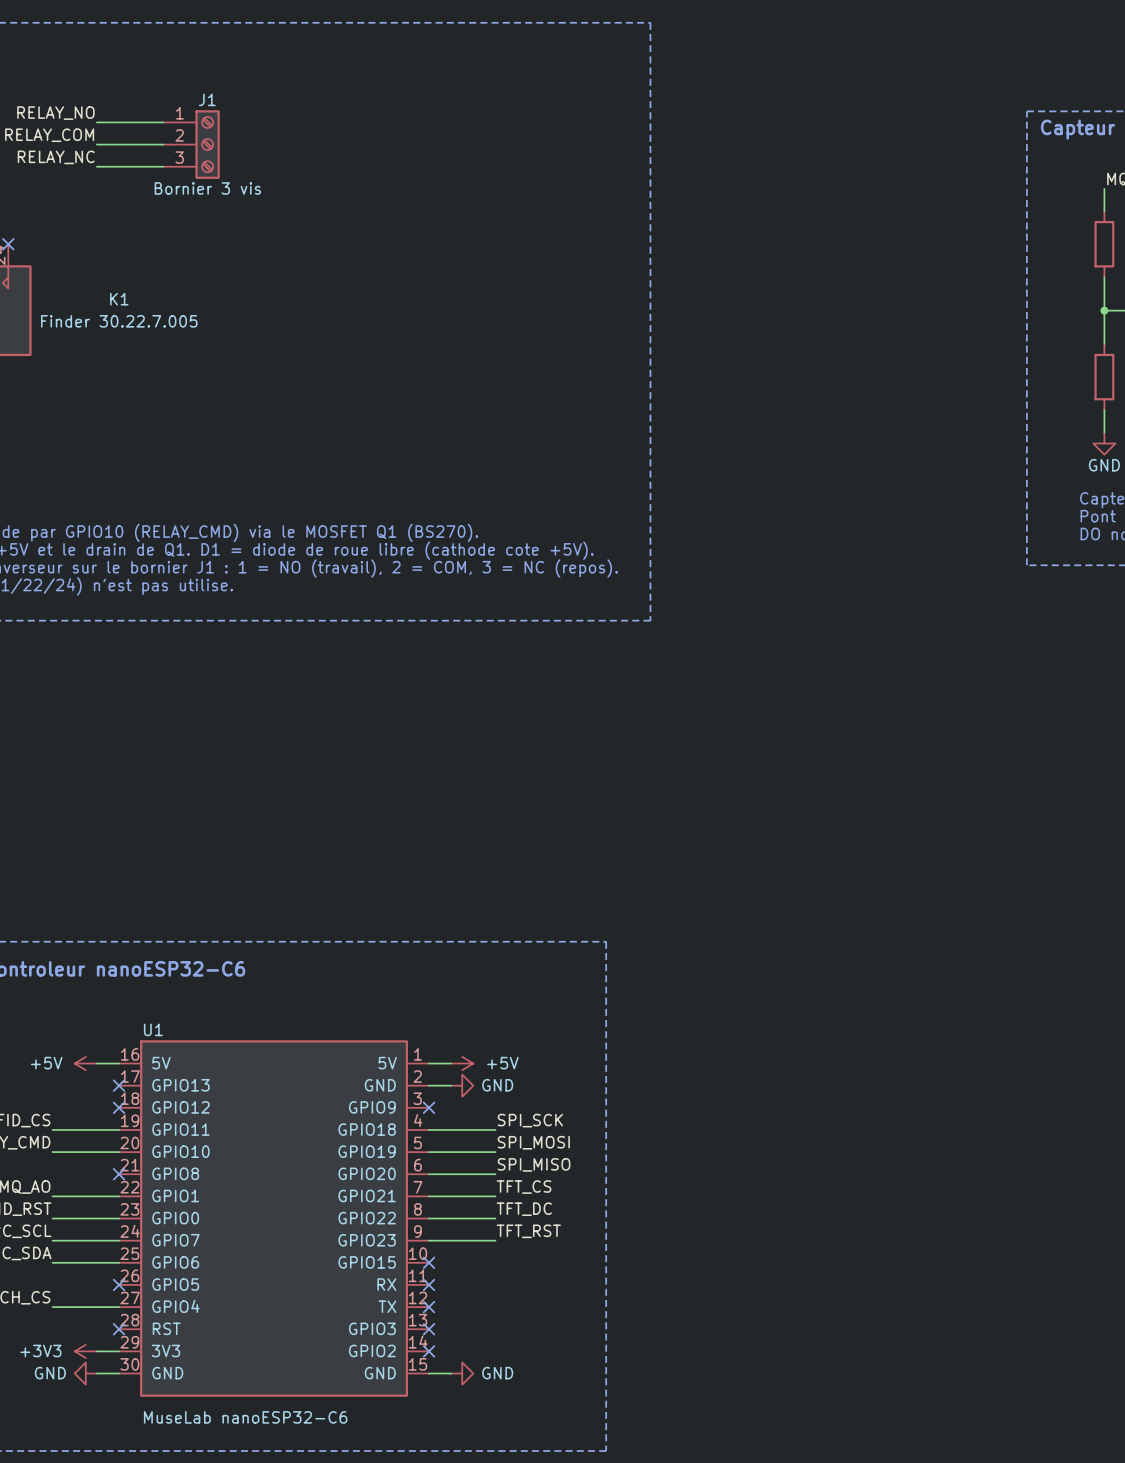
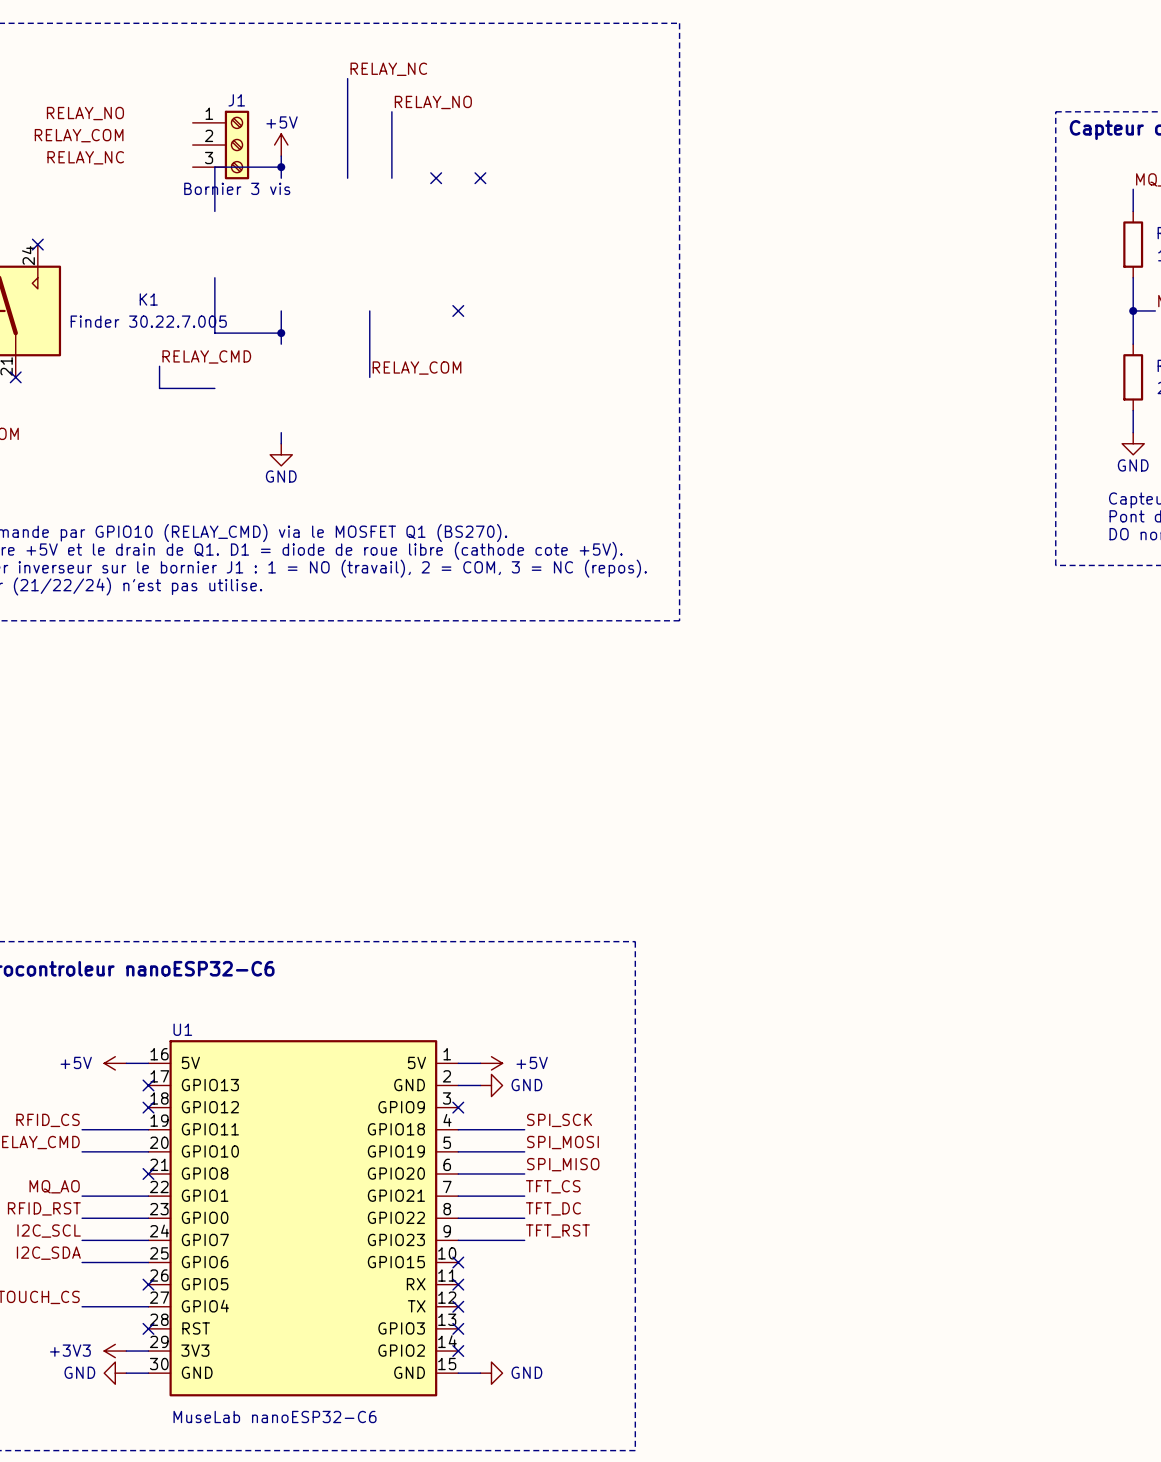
label: none -> RELAY_NC (388, 69)
wire: none -> (347, 78) (347, 178)
label: none -> RELAY_NO (433, 102)
wire: none -> (391, 111) (391, 178)
wire: (96, 122) (163, 122) -> none
wire: (96, 144) (163, 144) -> none
power symbol: none -> +5V (281, 145)
wire: none -> (281, 156) (281, 178)
wire: (96, 166) (163, 166) -> none
wire: none -> (281, 167) (214, 167) (214, 211)
junction: none -> (281, 167)
no-connect mark: none -> (436, 178)
no-connect mark: none -> (480, 178)
wire: none -> (214, 277) (214, 333) (281, 333)
wire: none -> (281, 310) (281, 344)
wire: none -> (369, 310) (369, 377)
no-connect mark: none -> (458, 310)
junction: none -> (281, 333)
label: none -> RELAY_CMD (206, 356)
wire: none -> (159, 366) (159, 388) (214, 388)
label: none -> RELAY_COM (417, 368)
wire: none -> (281, 432) (281, 443)
power symbol: none -> GND (281, 454)

